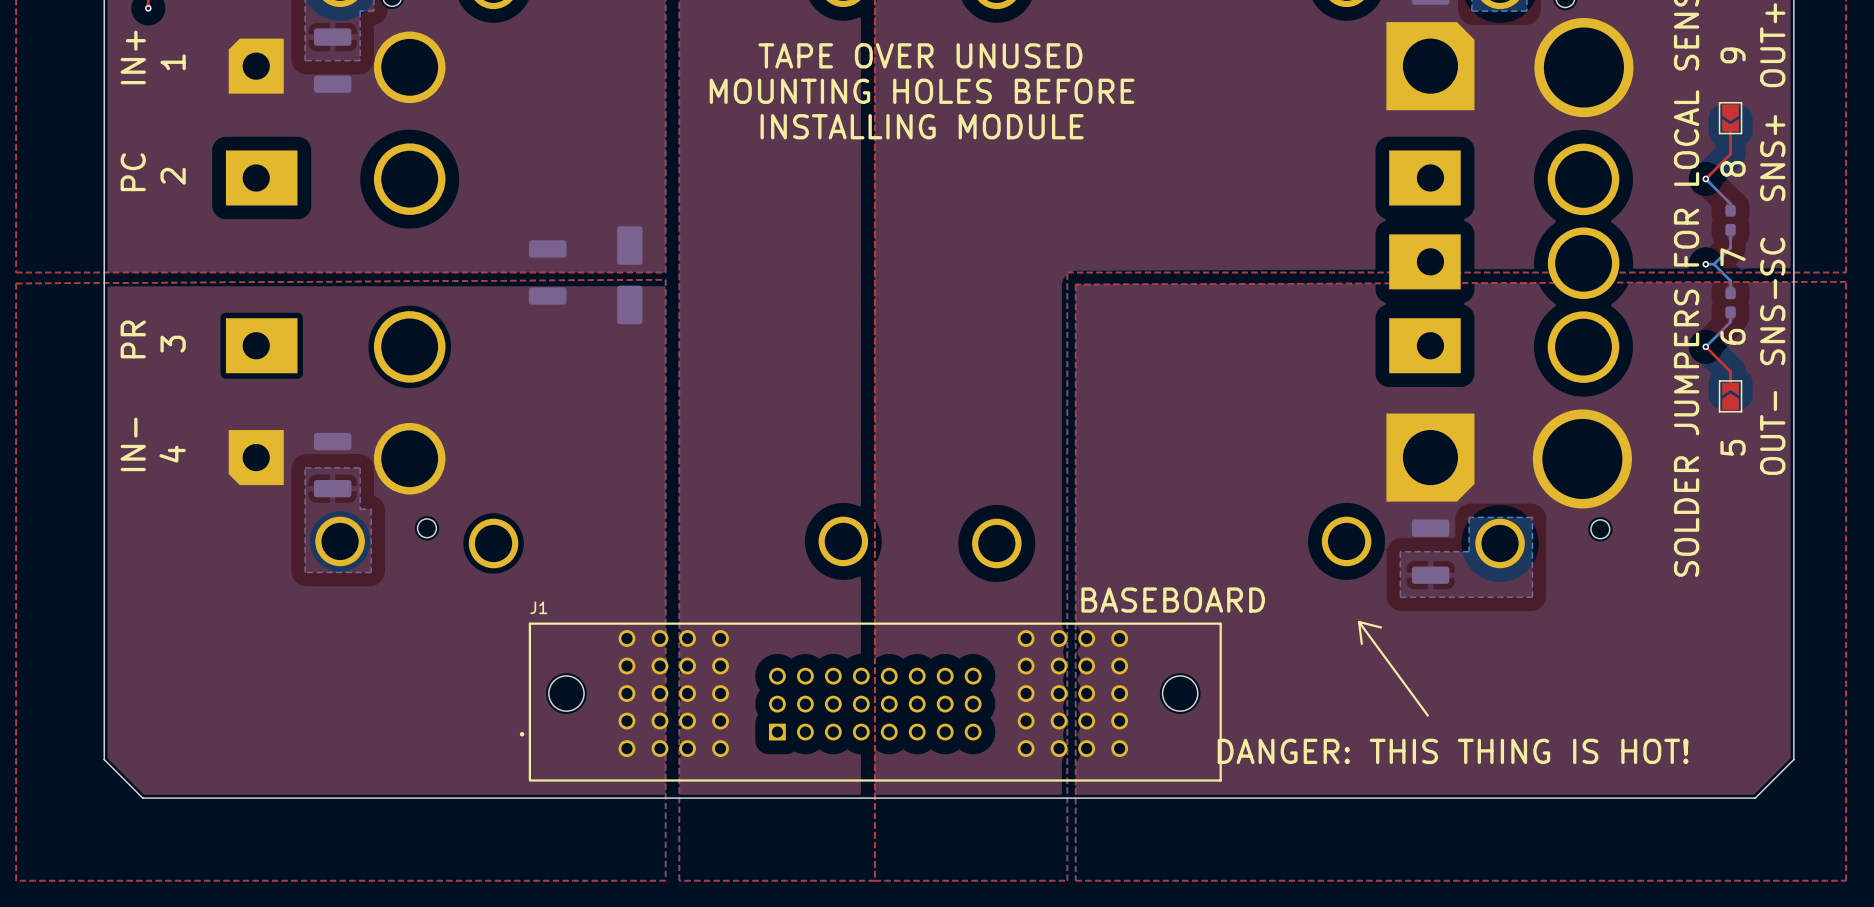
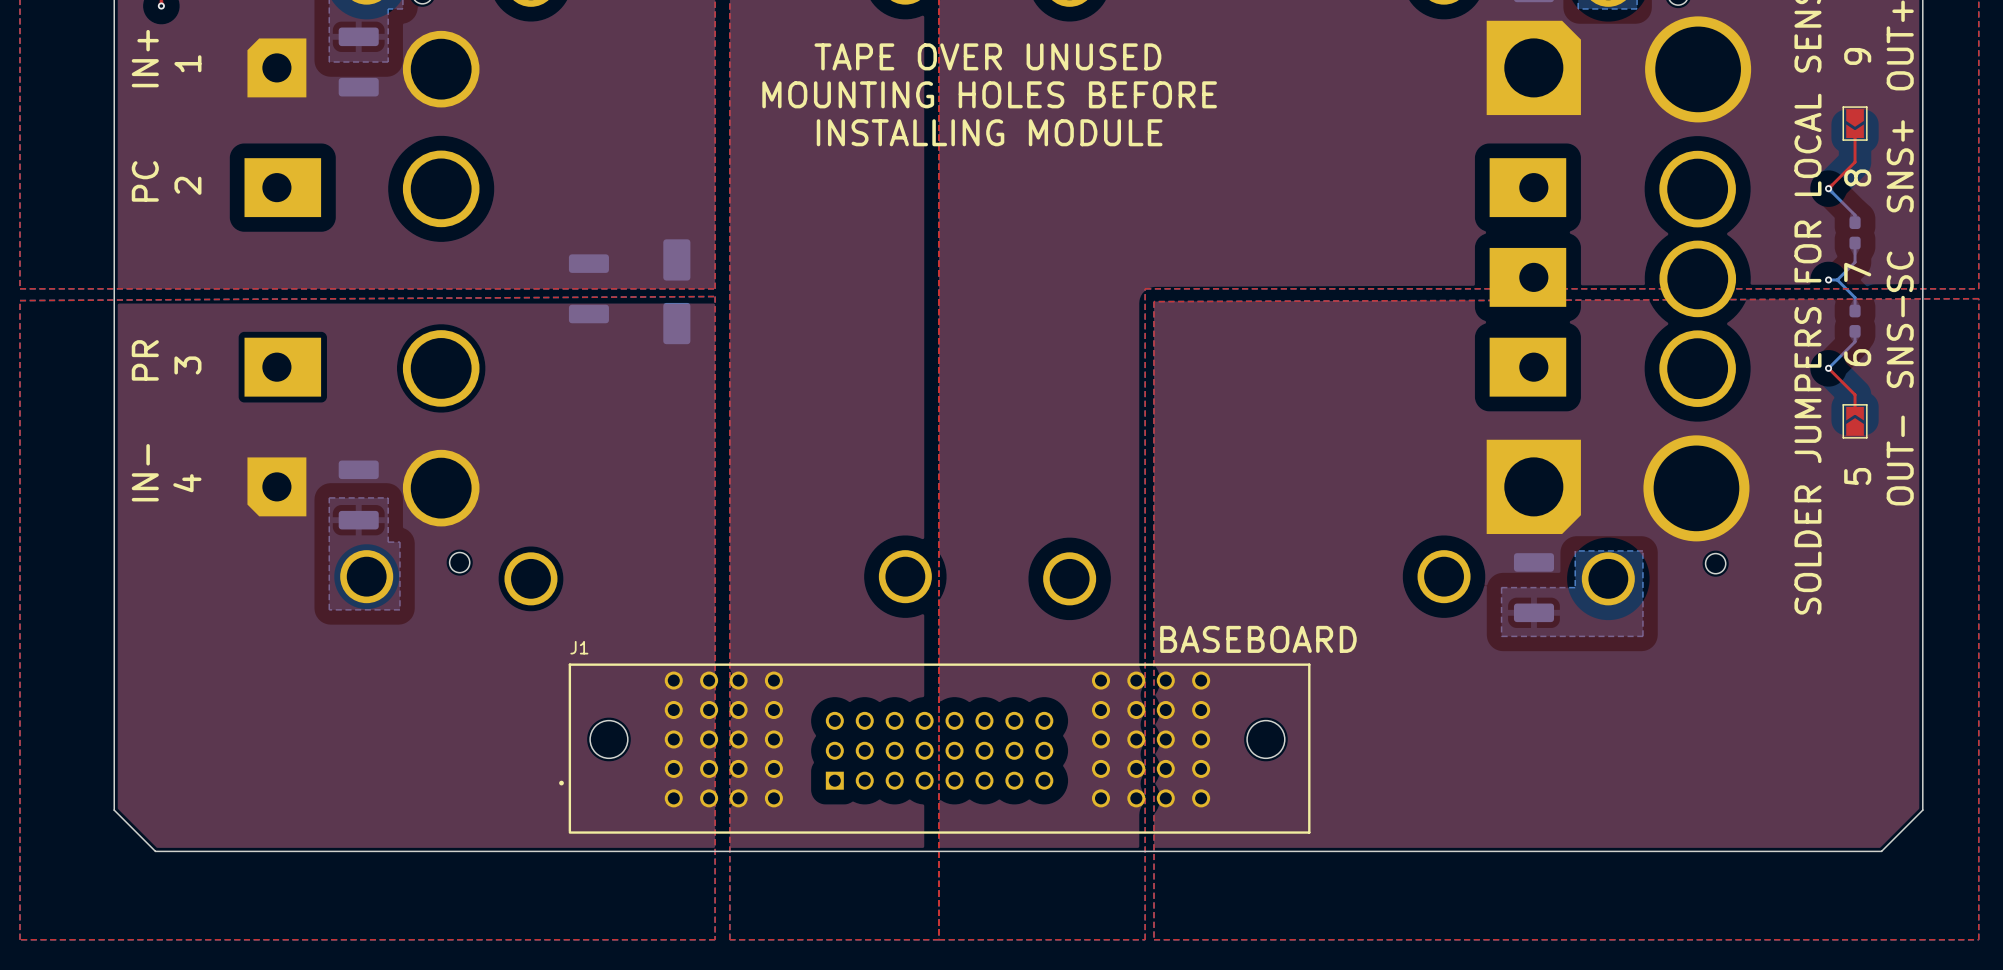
line: (1359, 621) (1427, 715) -> none
line: (1359, 621) (1381, 627) -> none
line: (1359, 621) (1361, 644) -> none
text: DANGER: THIS THING IS HOT! (1453, 751) -> none

